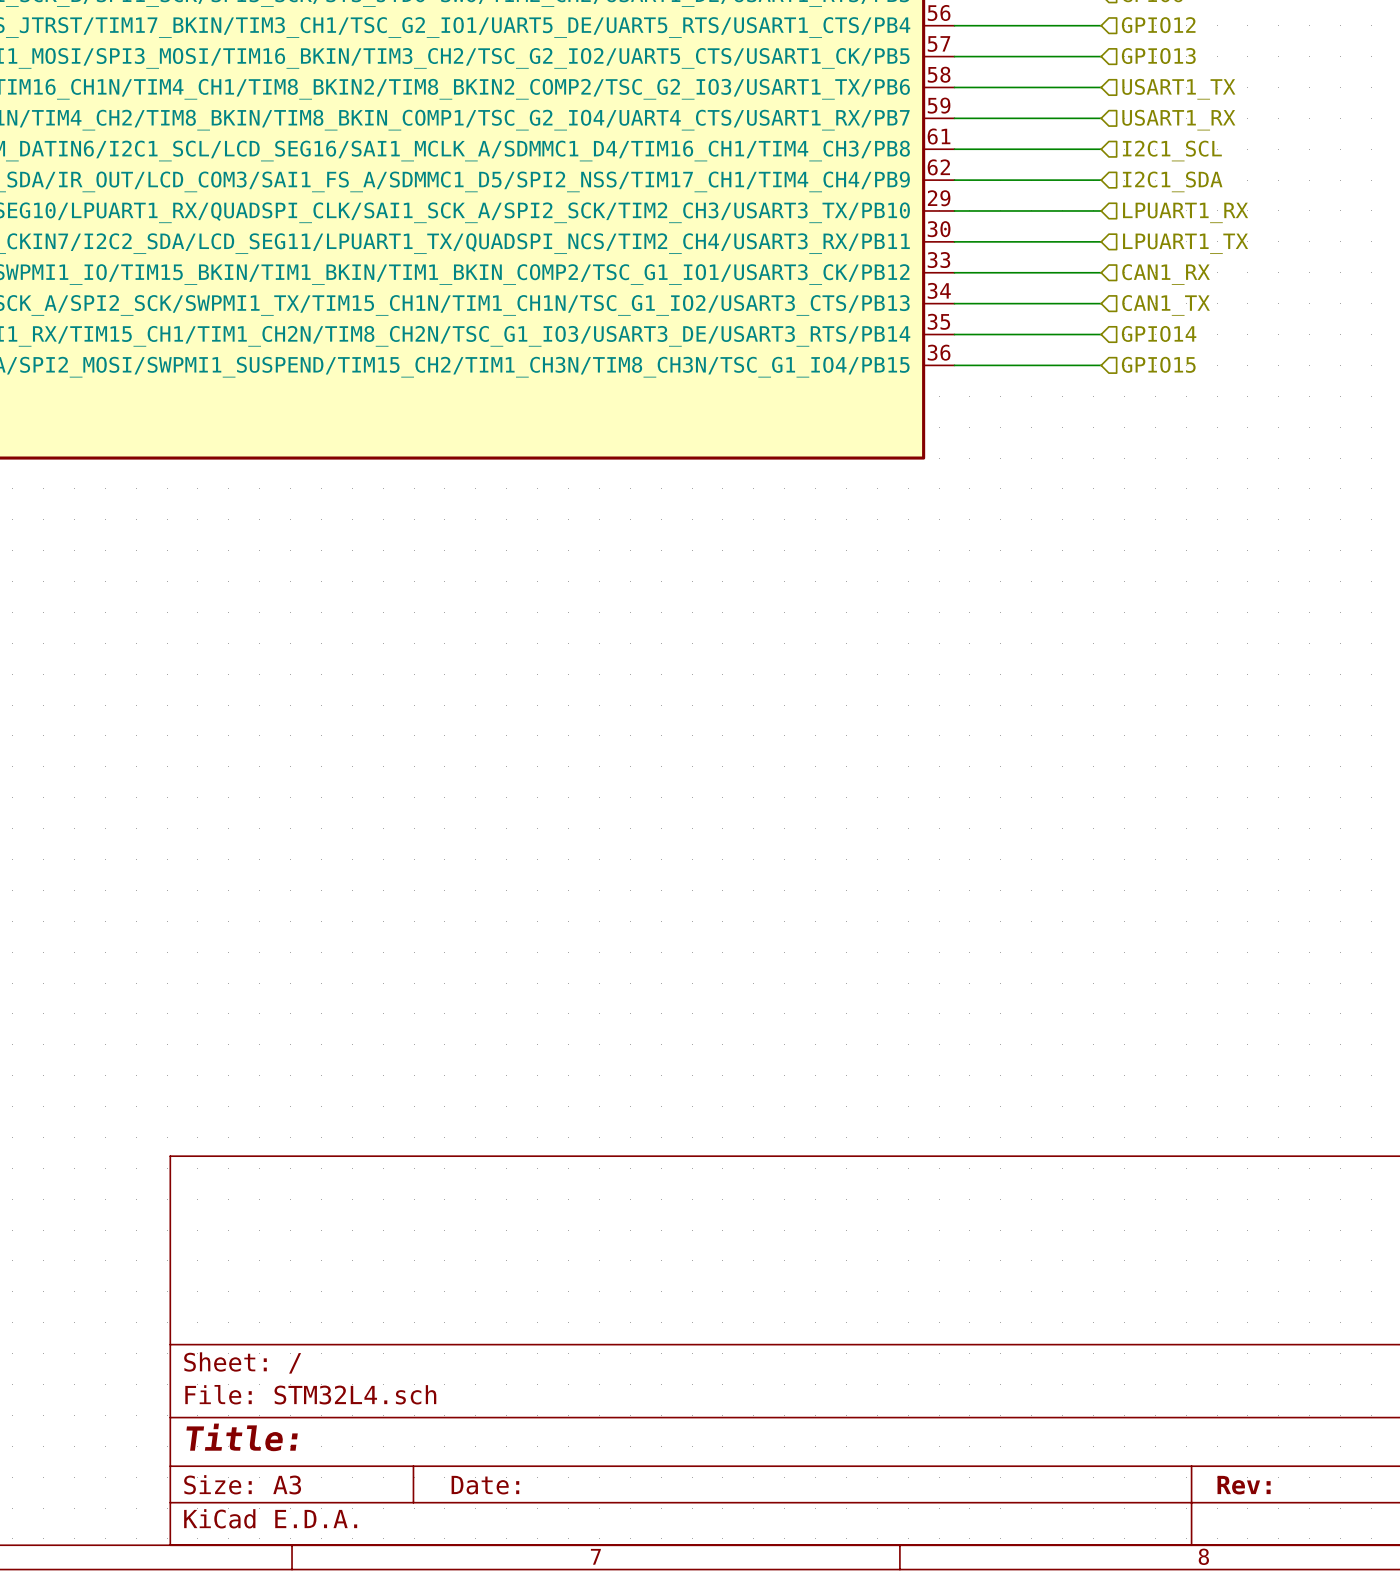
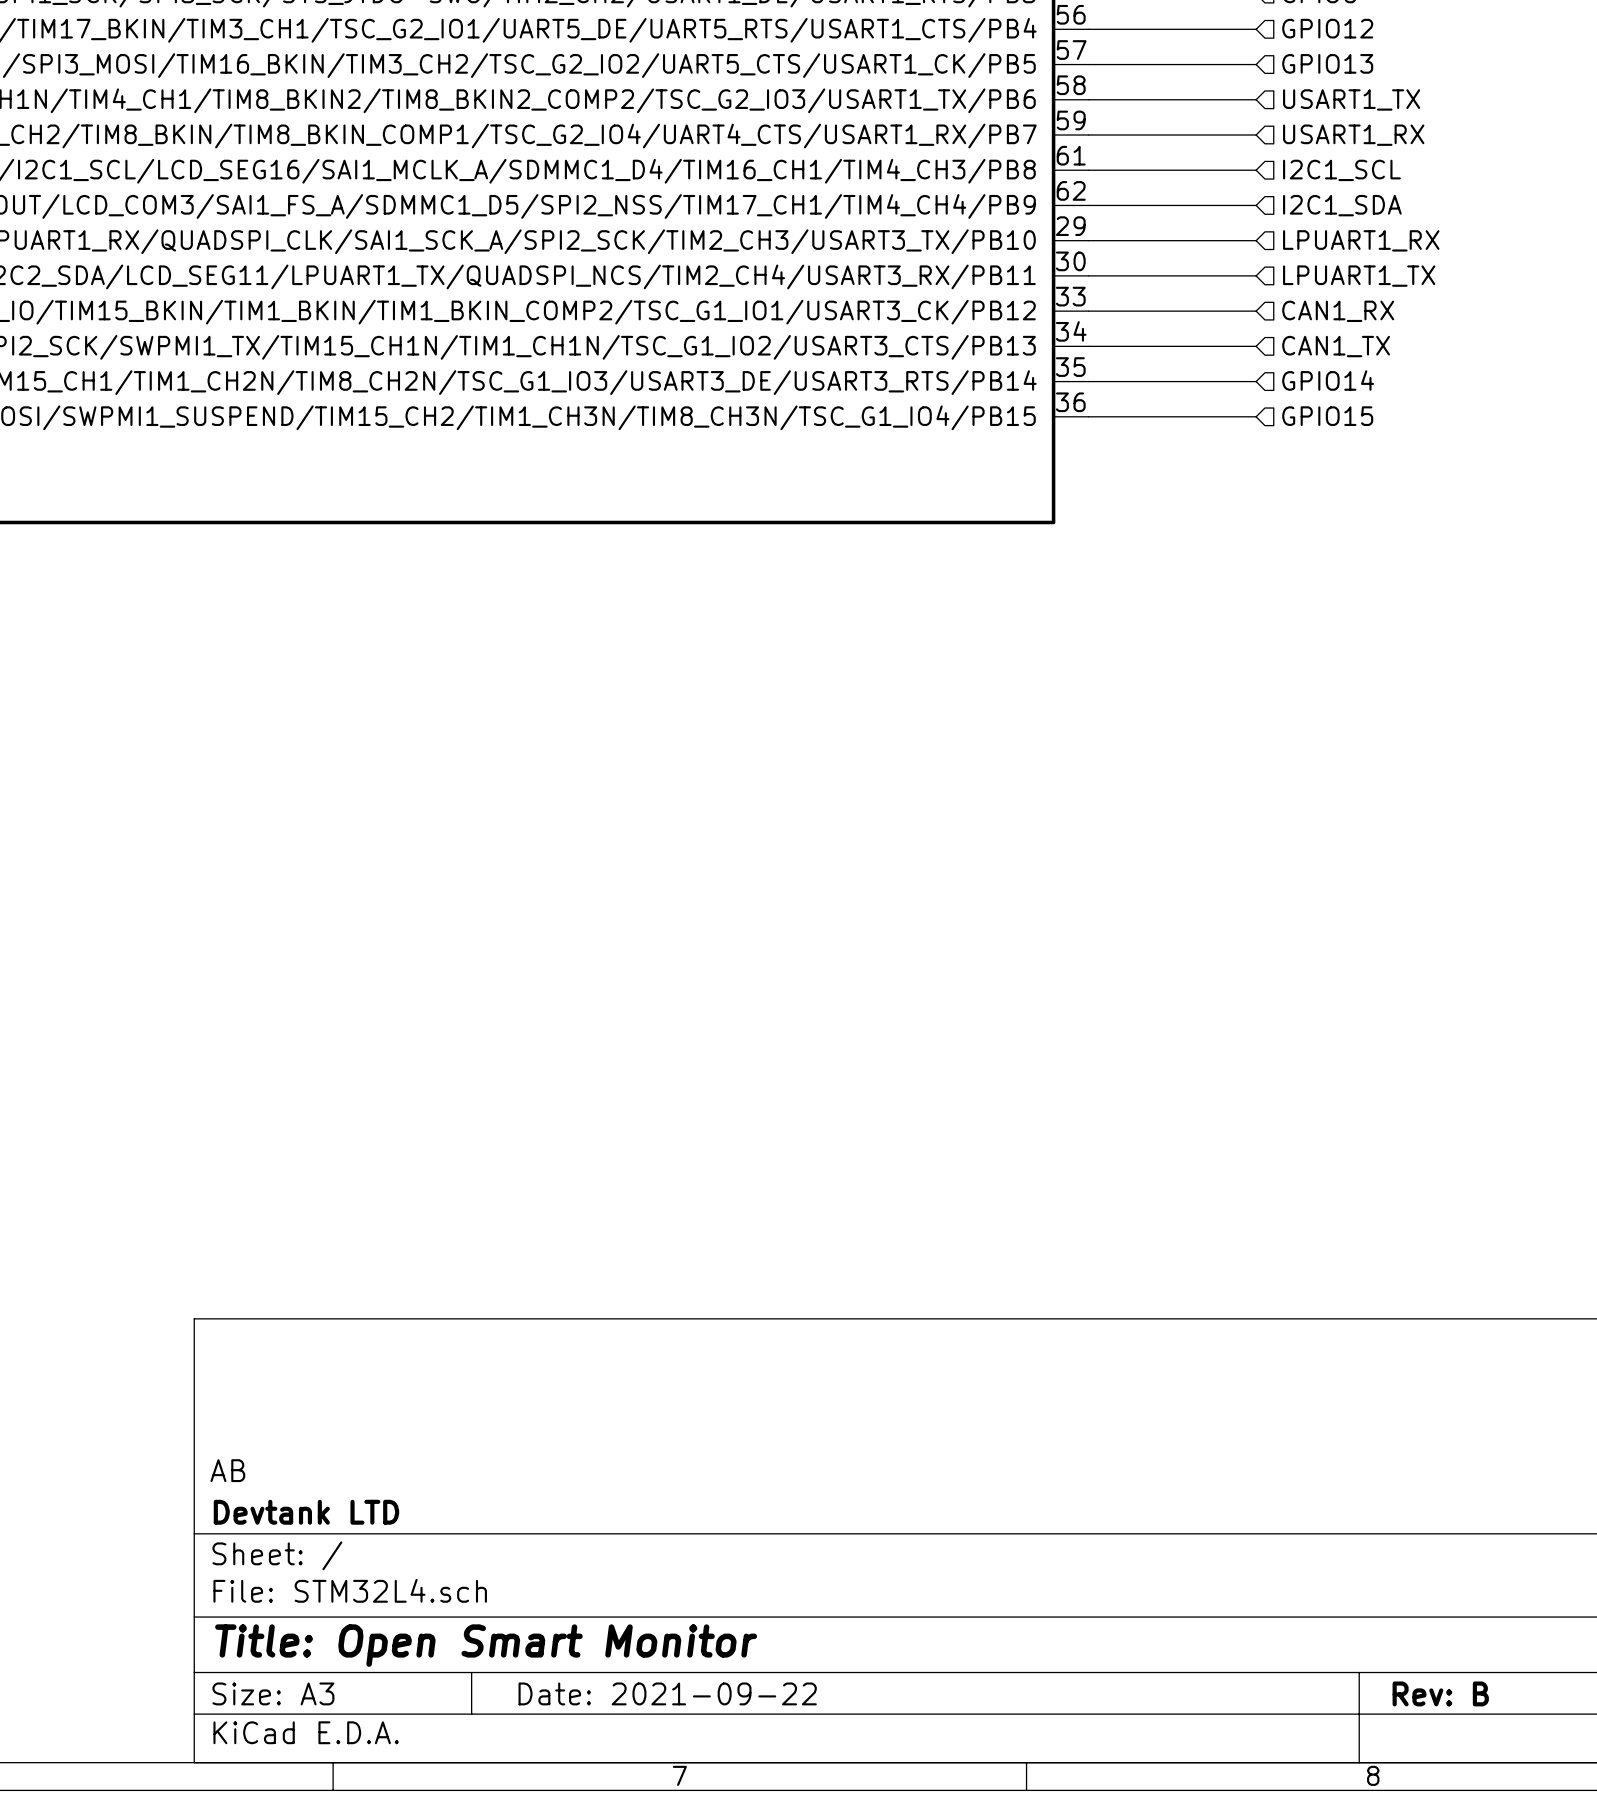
title block: none -> AB (227, 1470)
title block: none -> Devtank LTD (306, 1512)
title block: Title: (242, 1437) -> Title: Open Smart Monitor (486, 1645)
title block: Date: (485, 1485) -> Date: 2021-09-22 (667, 1693)
title block: Rev: (1244, 1485) -> Rev: B (1440, 1693)

